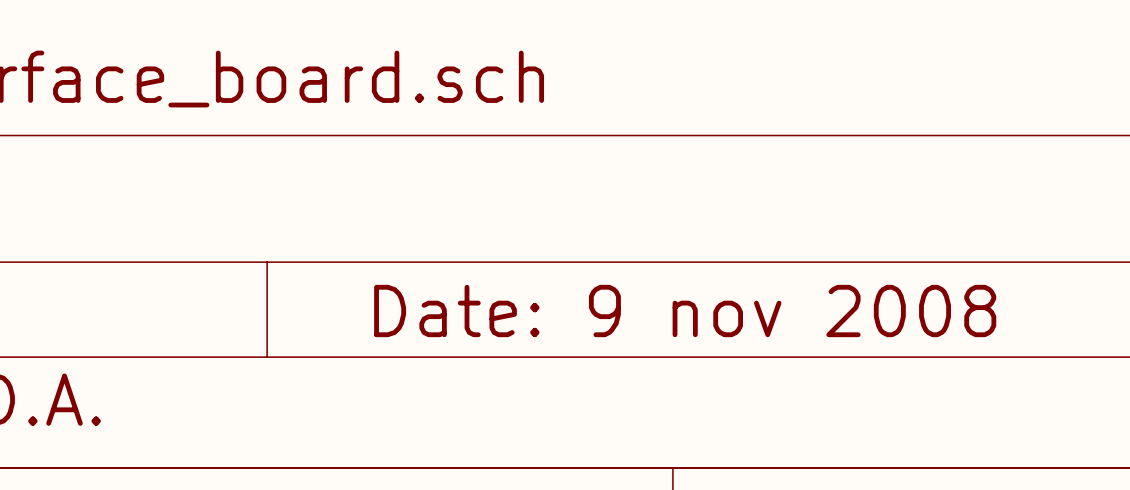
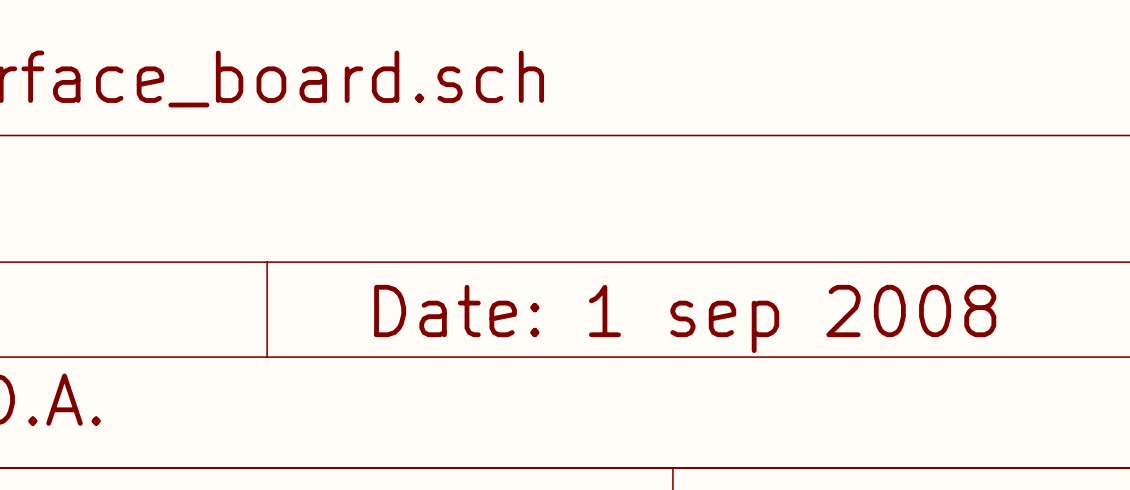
title block: Date: 9 nov 2008 (685, 311) -> Date: 1 sep 2008 (685, 318)

